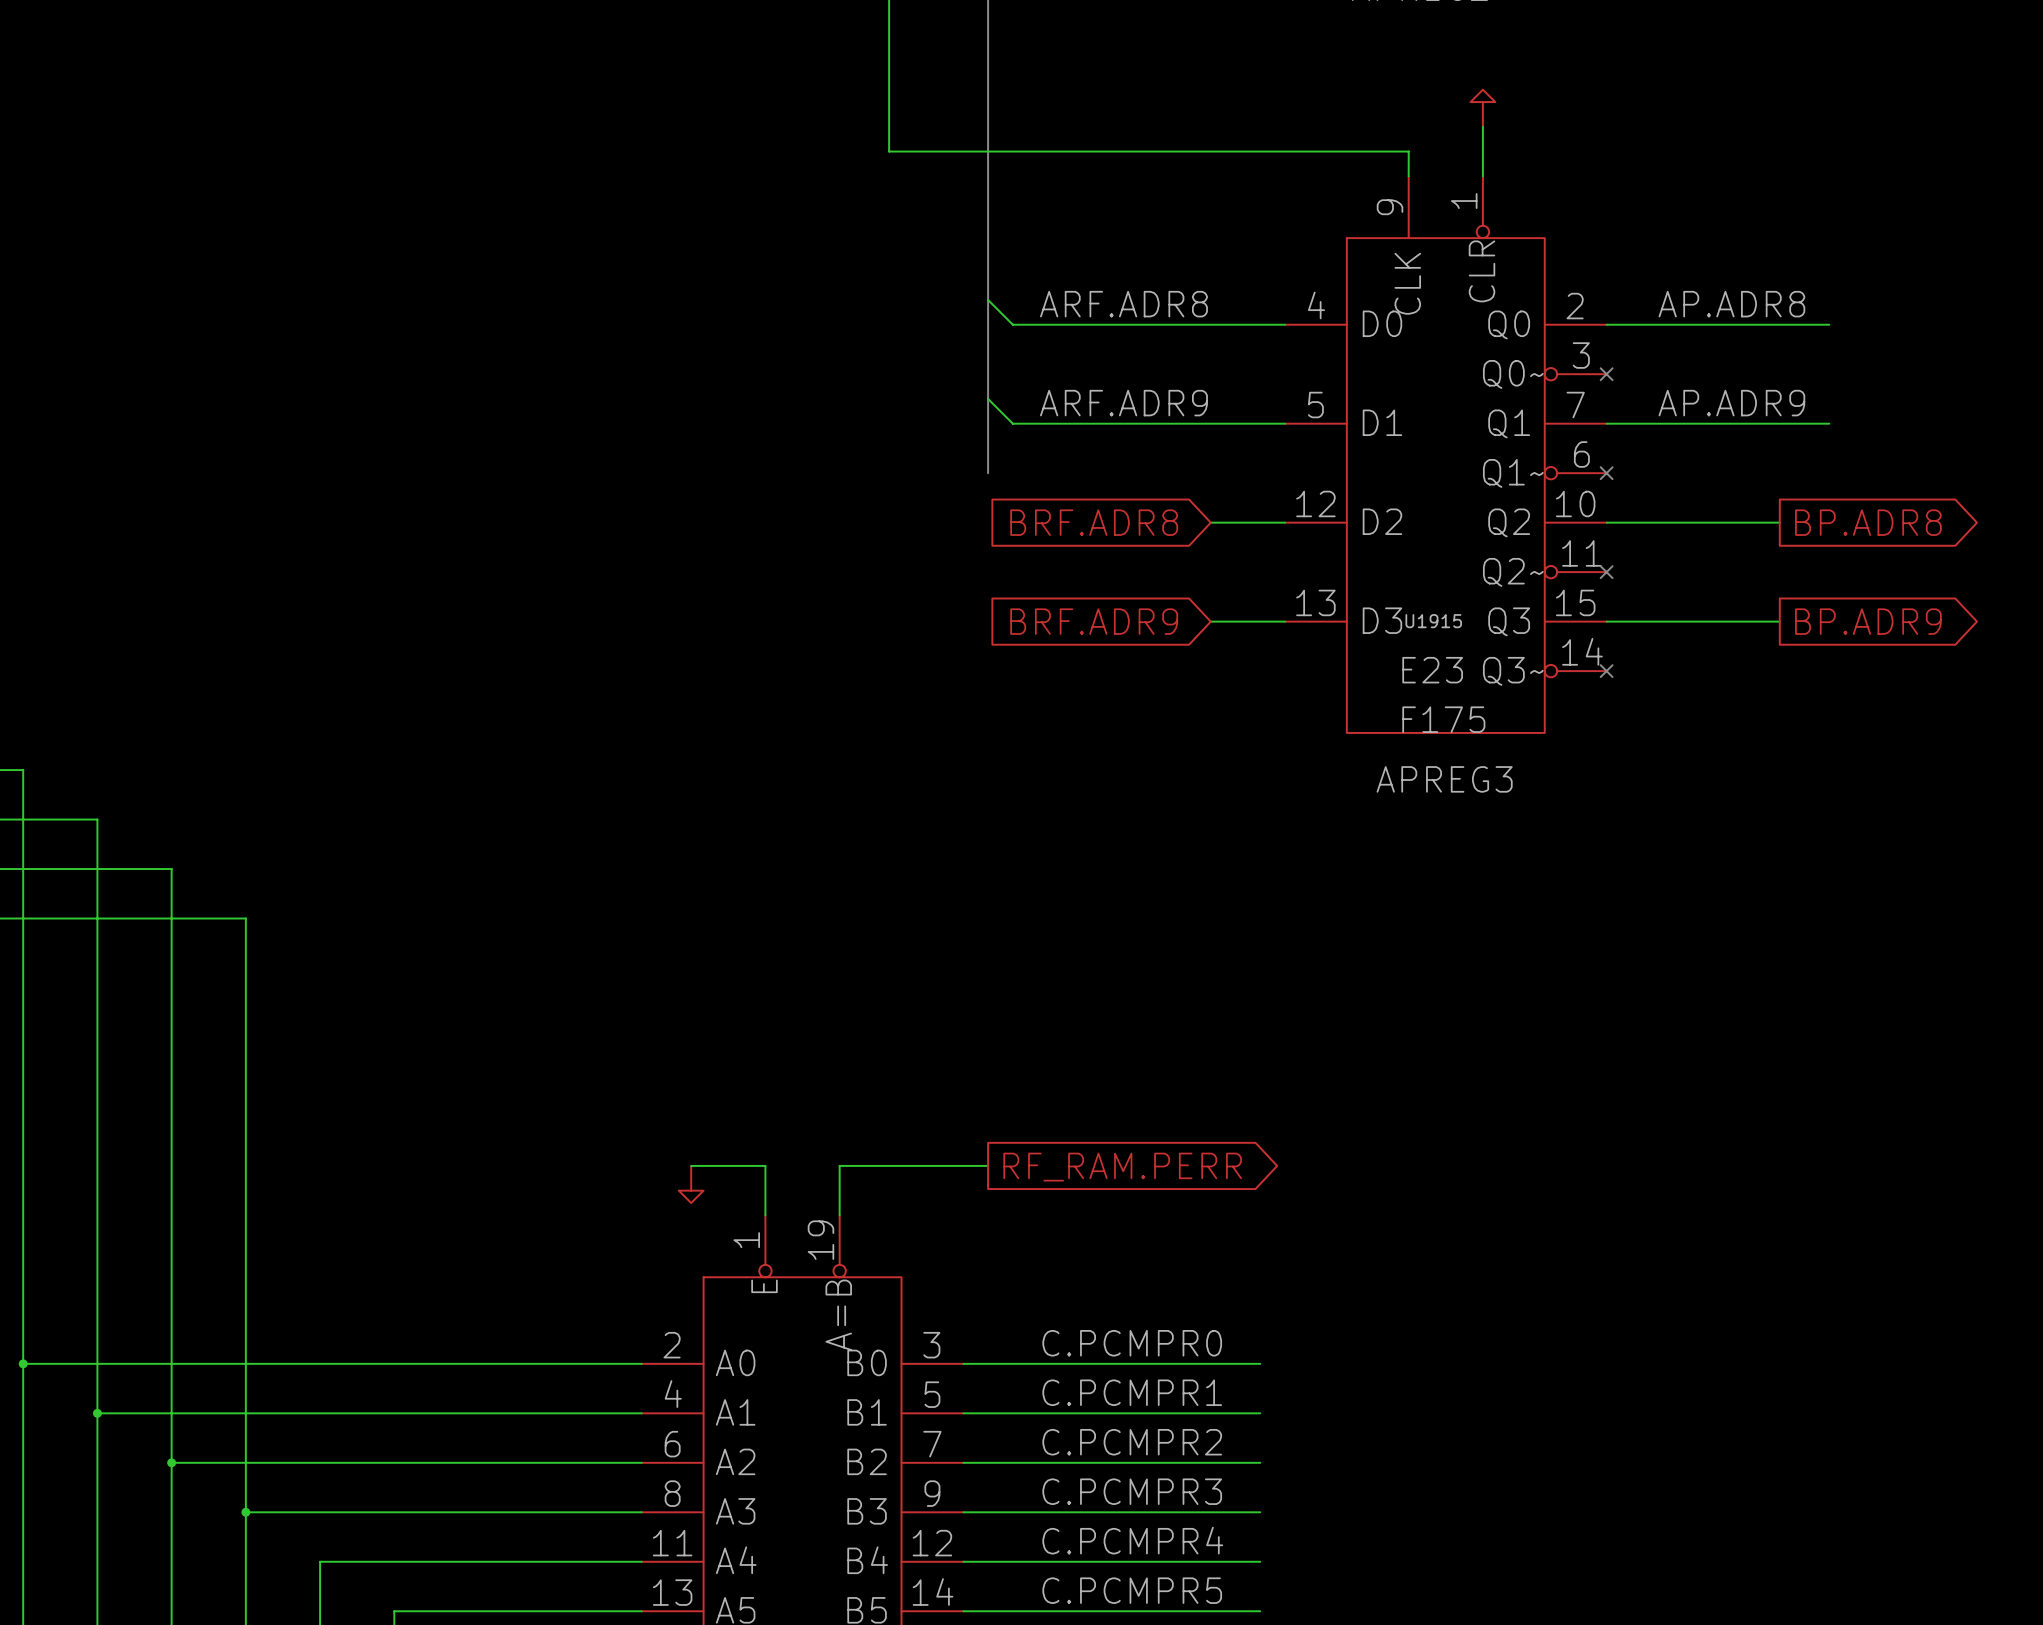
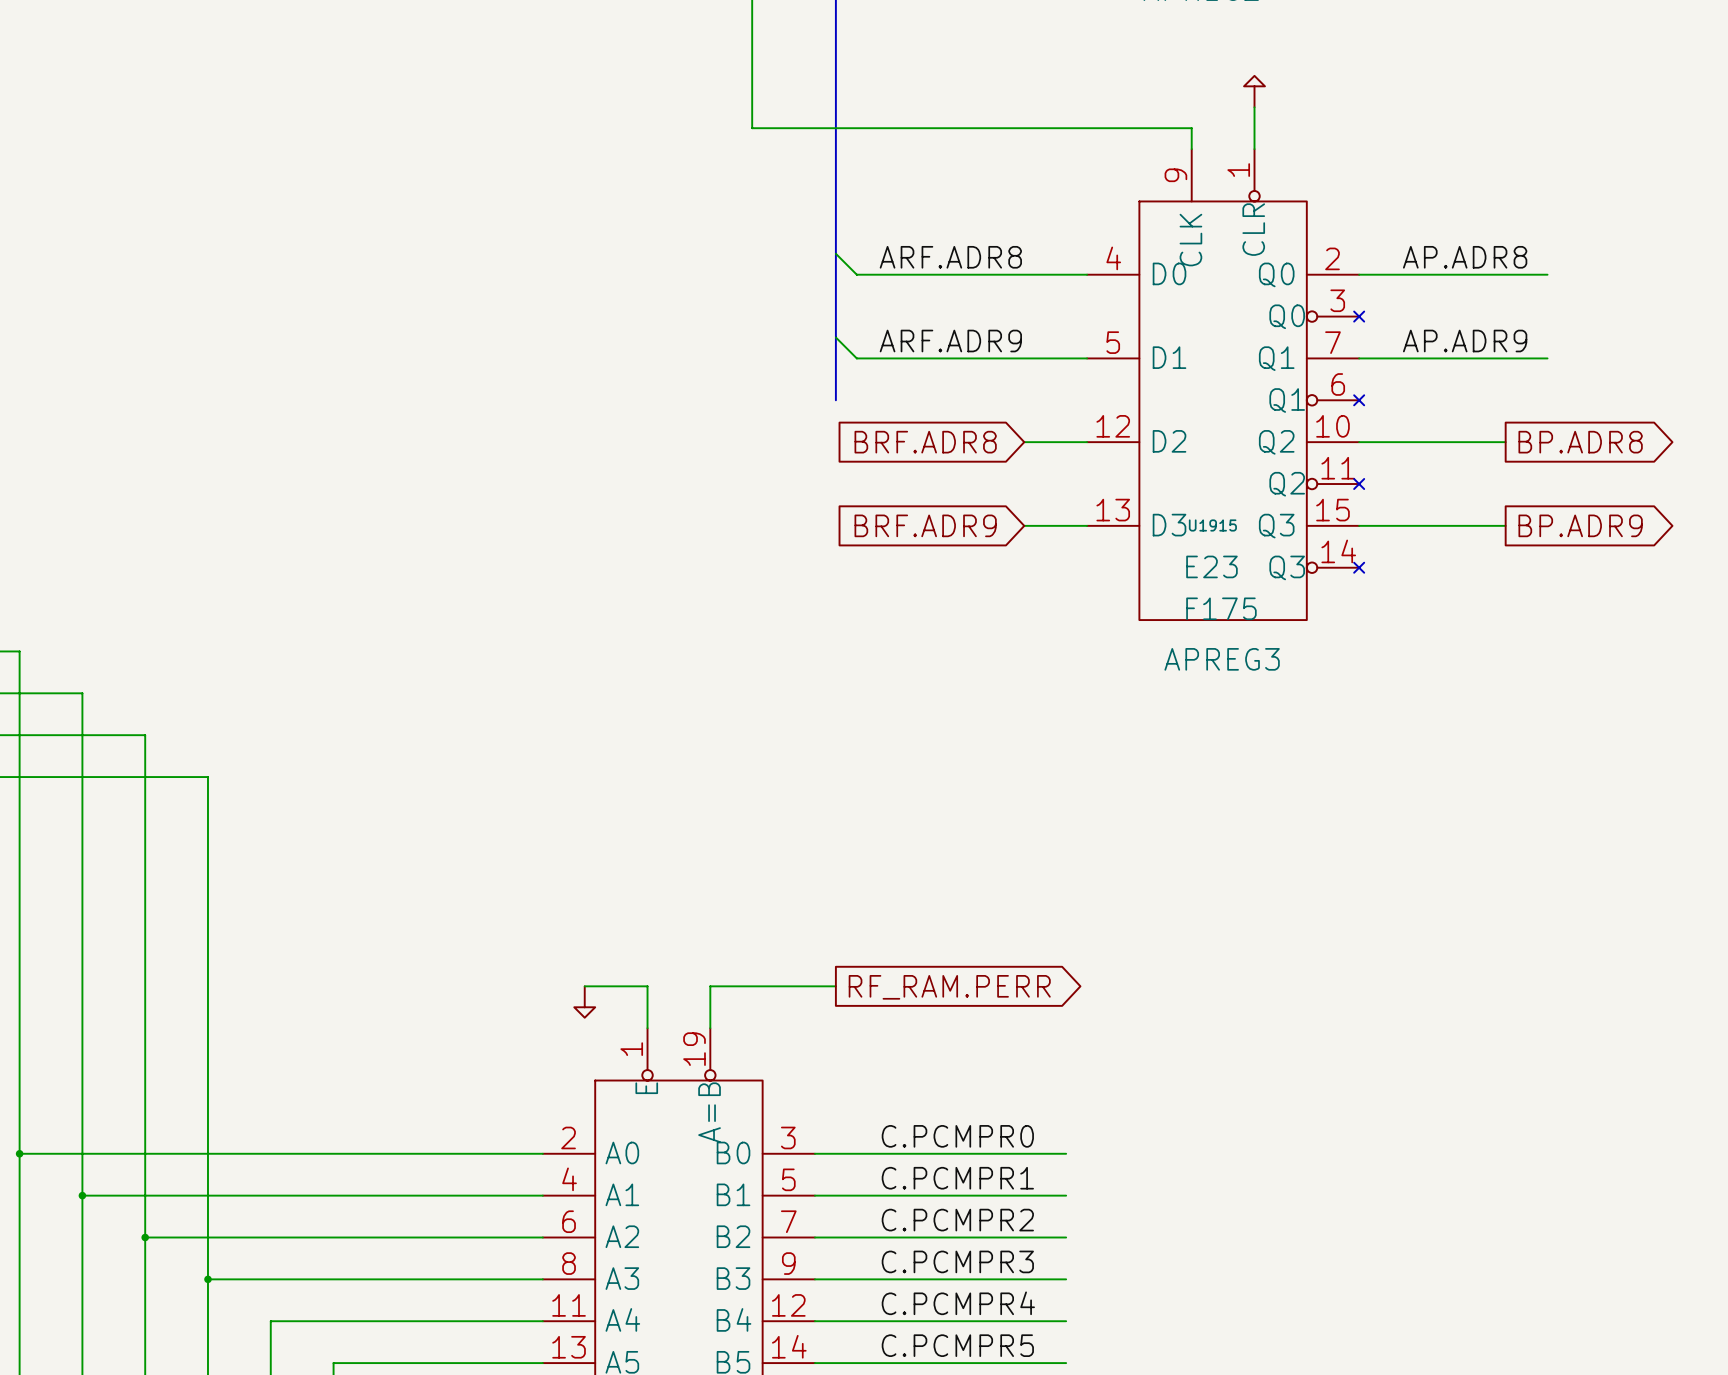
U1915 pin name: Q0~ (1513, 374) -> Q0 (1287, 316)
U1915 pin name: Q1~ (1513, 473) -> Q1 (1287, 400)
U1915 pin name: Q2~ (1513, 572) -> Q2 (1287, 484)
U1915 pin name: Q3~ (1513, 671) -> Q3 (1287, 567)

